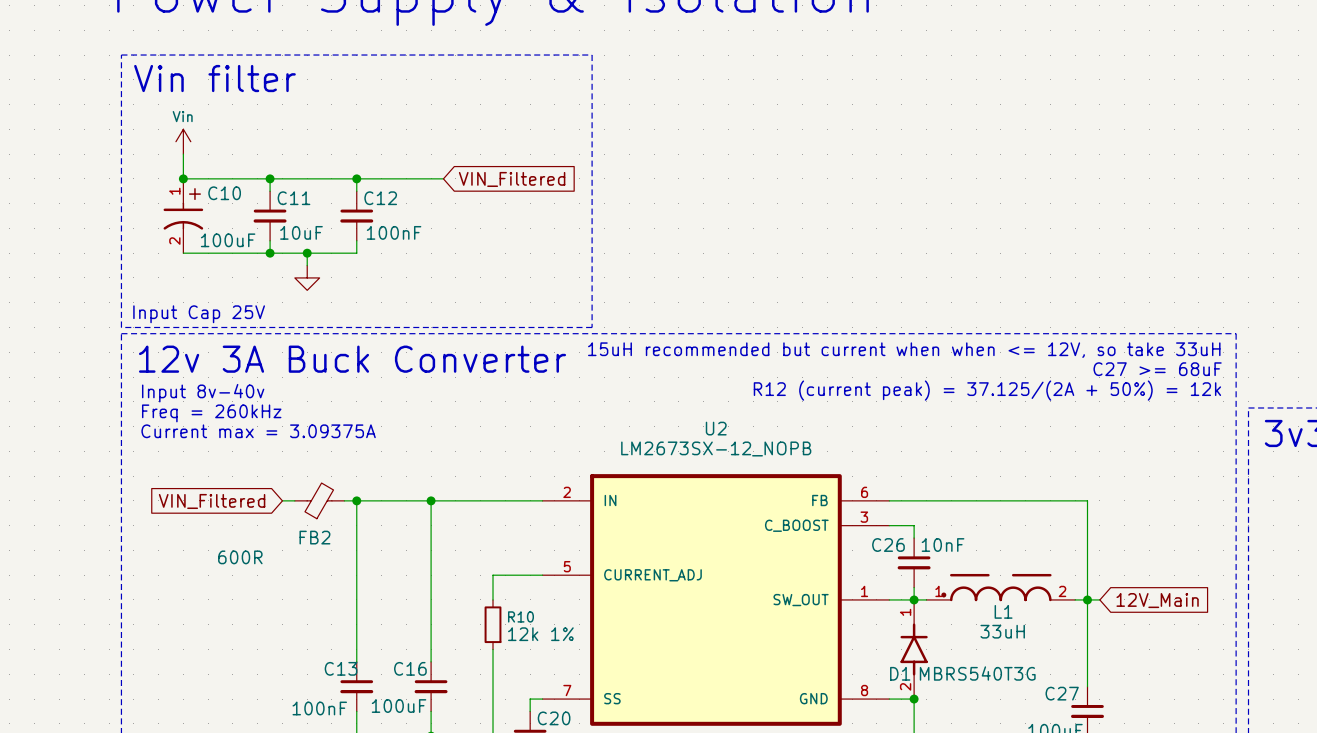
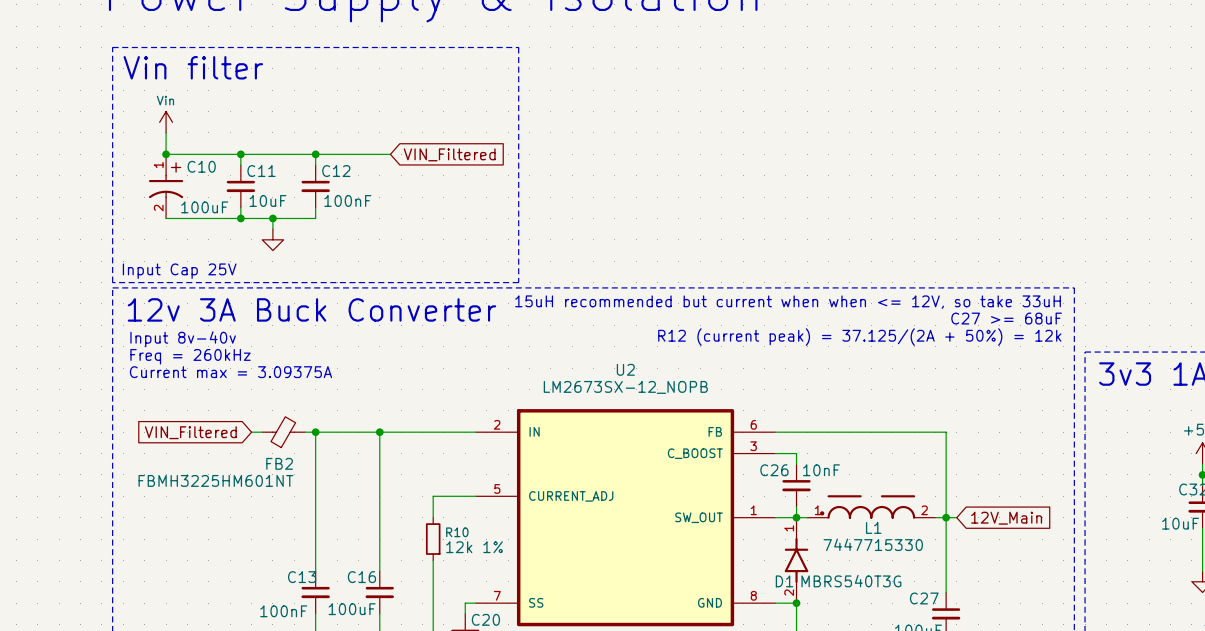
FB2 value: 600R (240, 557) -> FBMH3225HM601NT (215, 480)
L1 value: 33uH (1002, 631) -> 7447715330 (873, 544)

